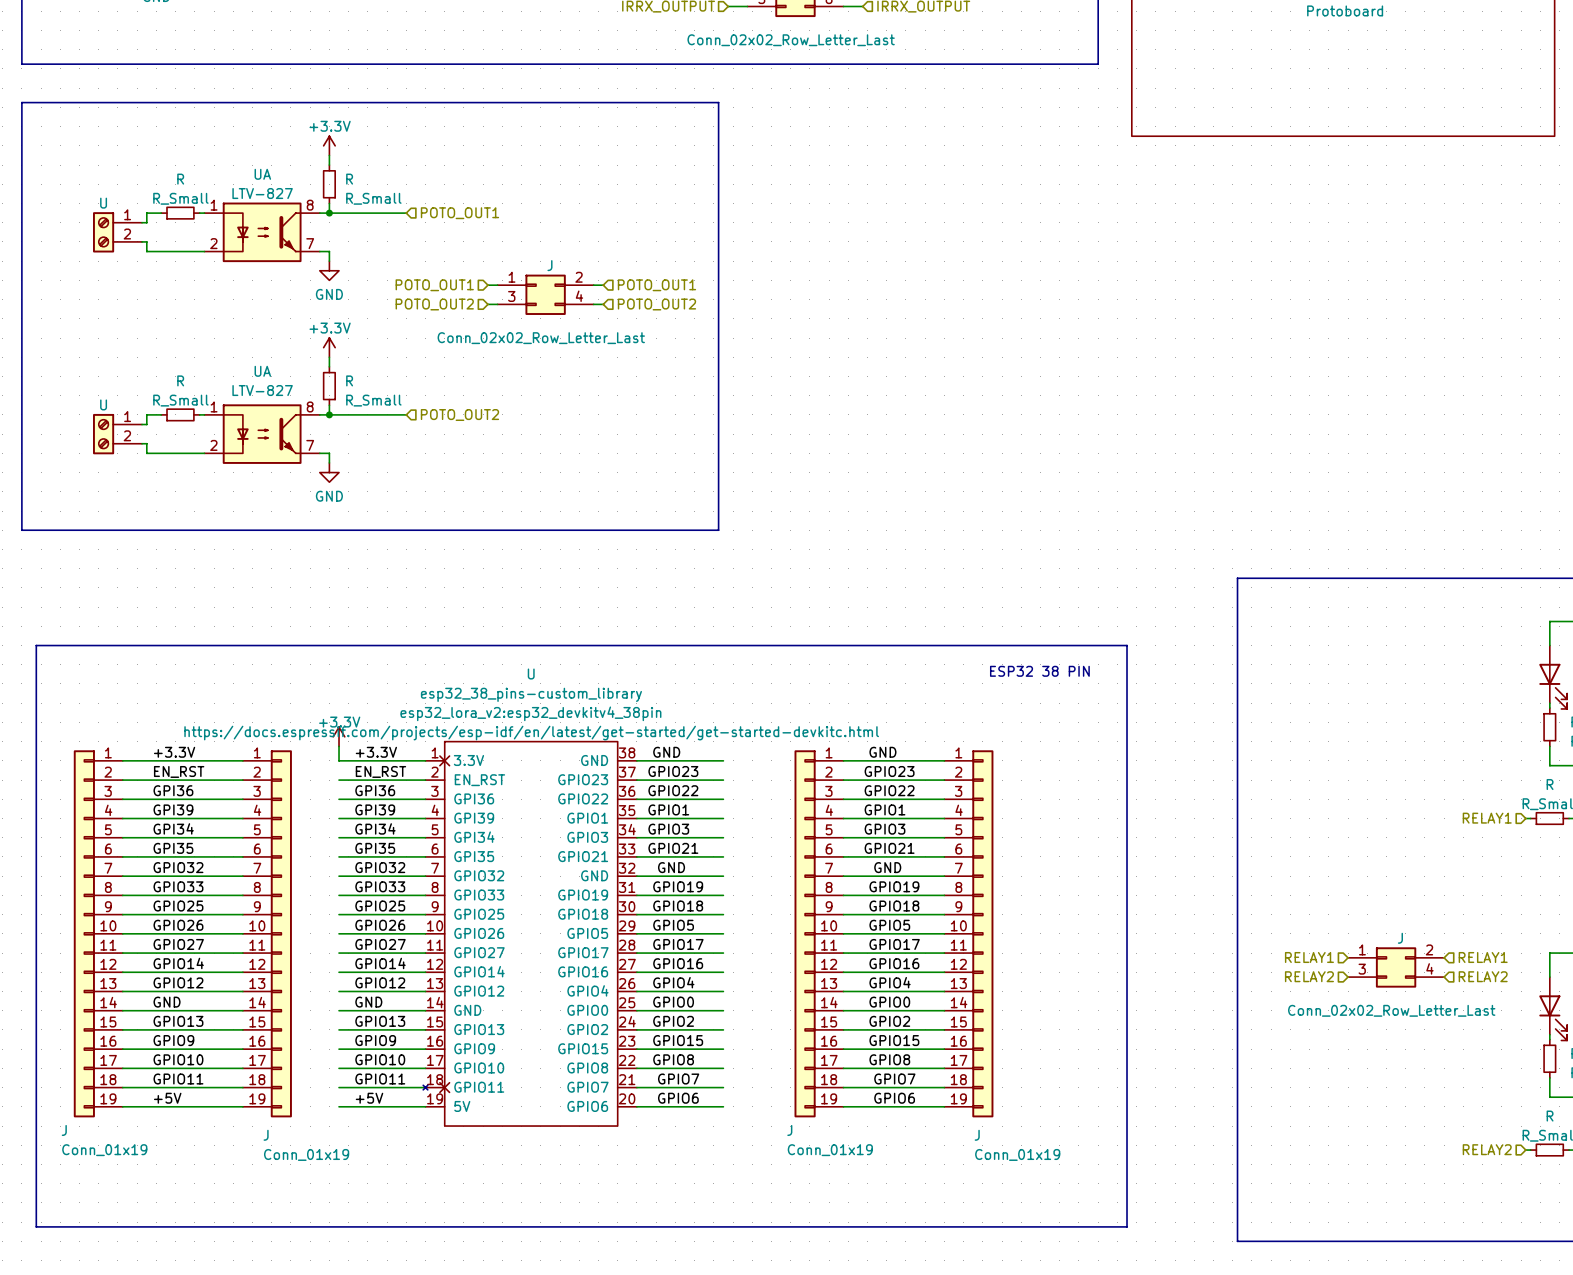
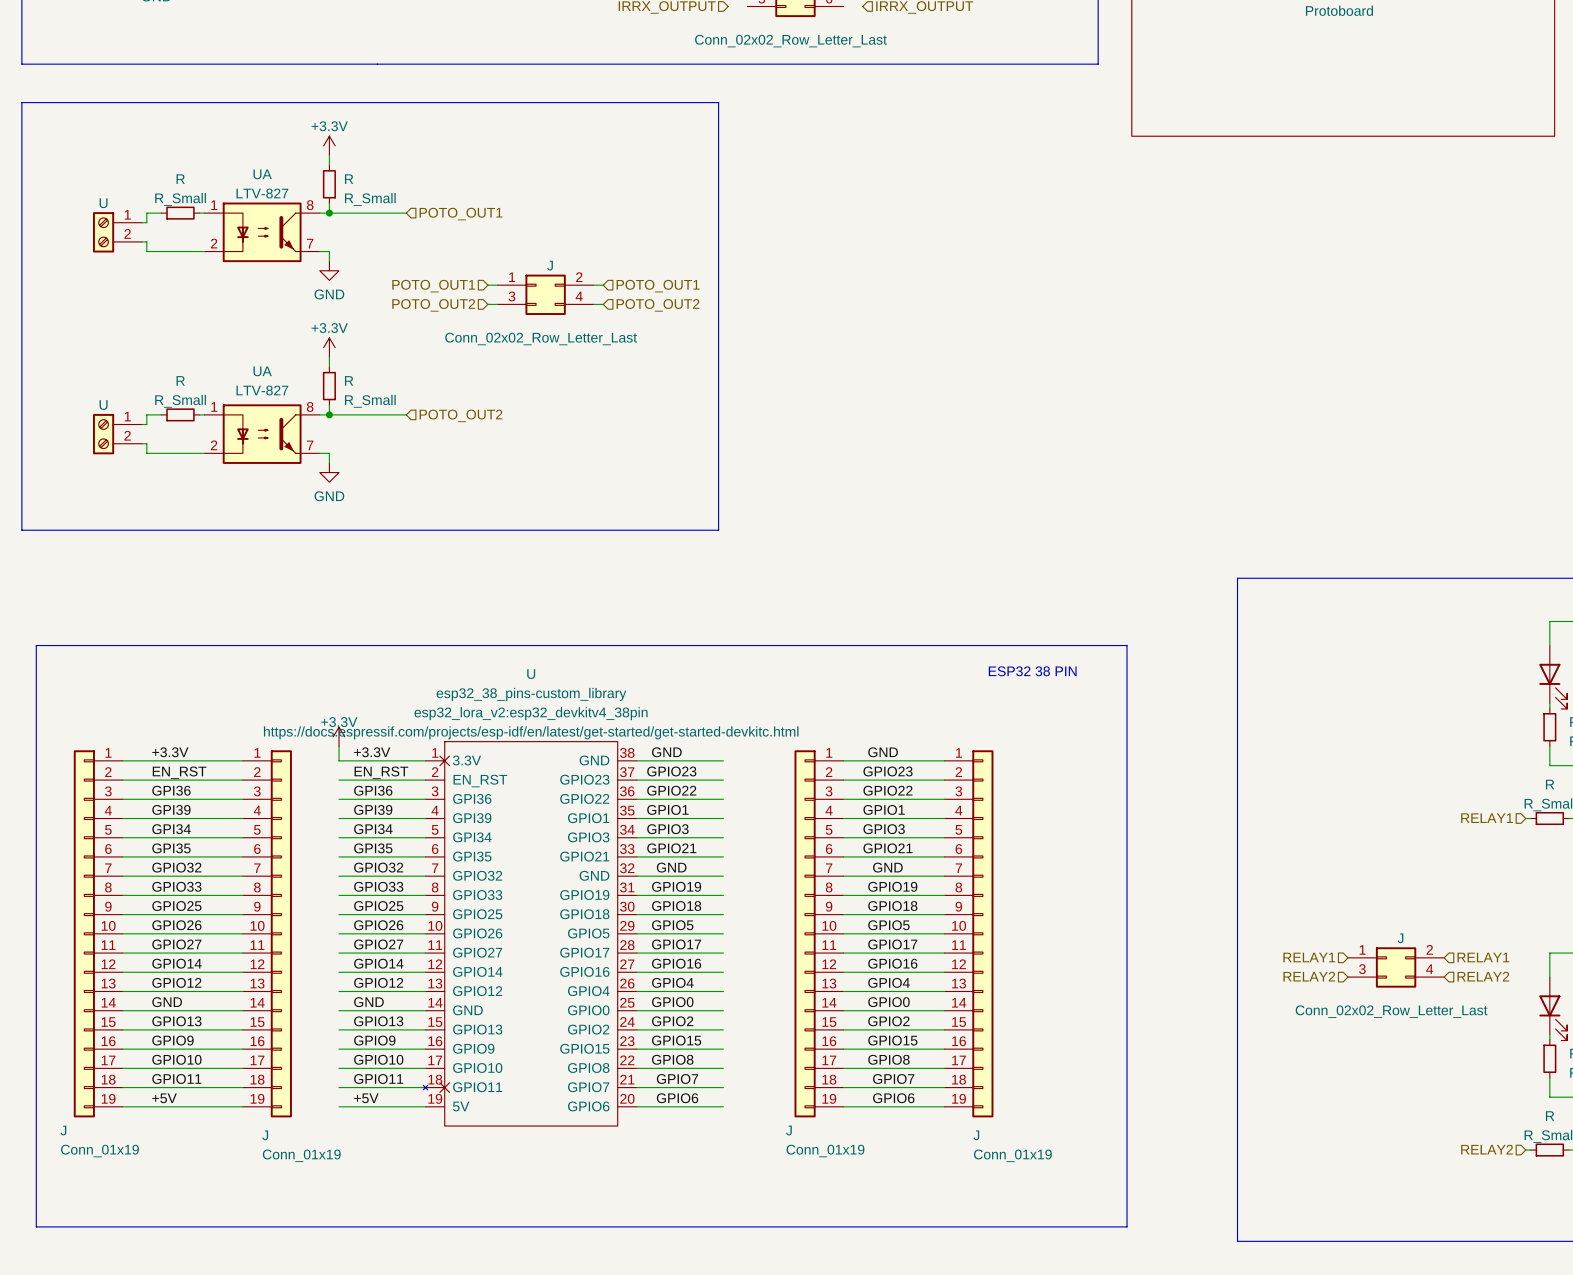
wire: (728, 6) (747, 6) -> none
wire: (843, 6) (862, 6) -> none

